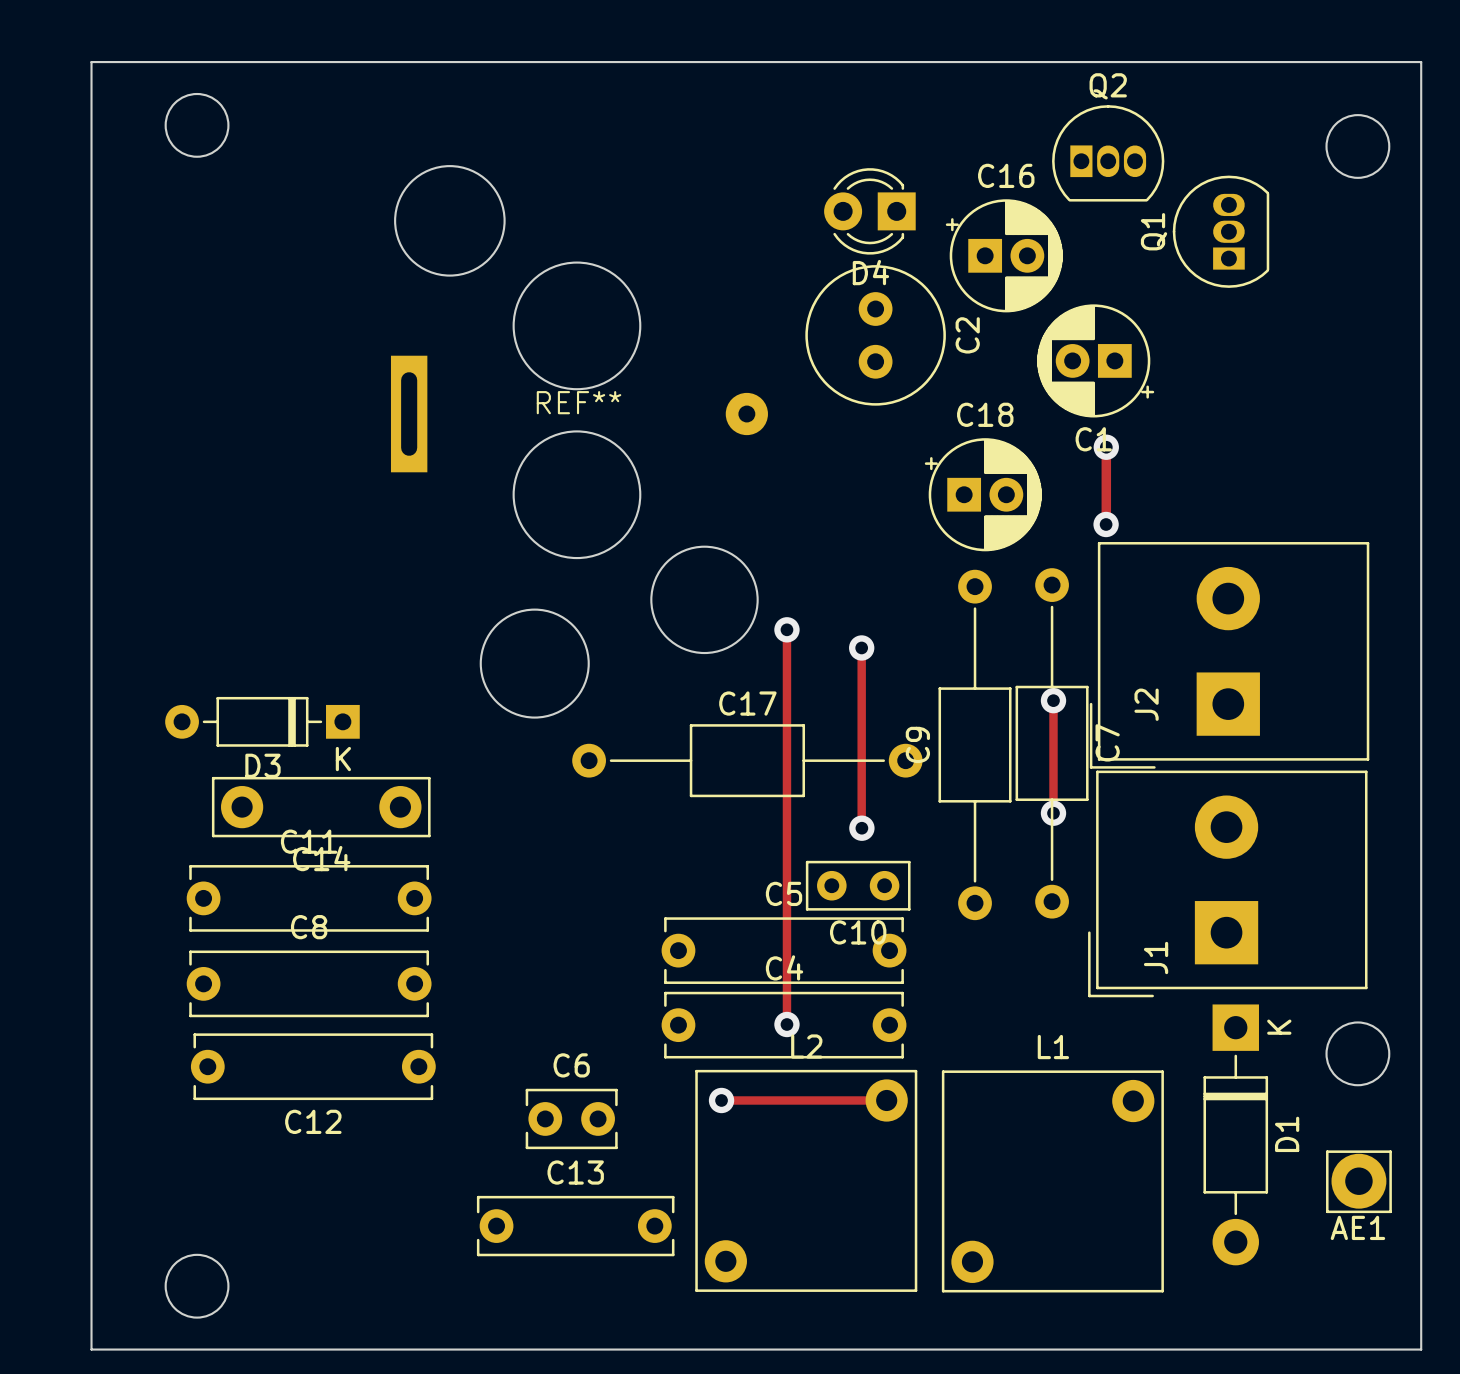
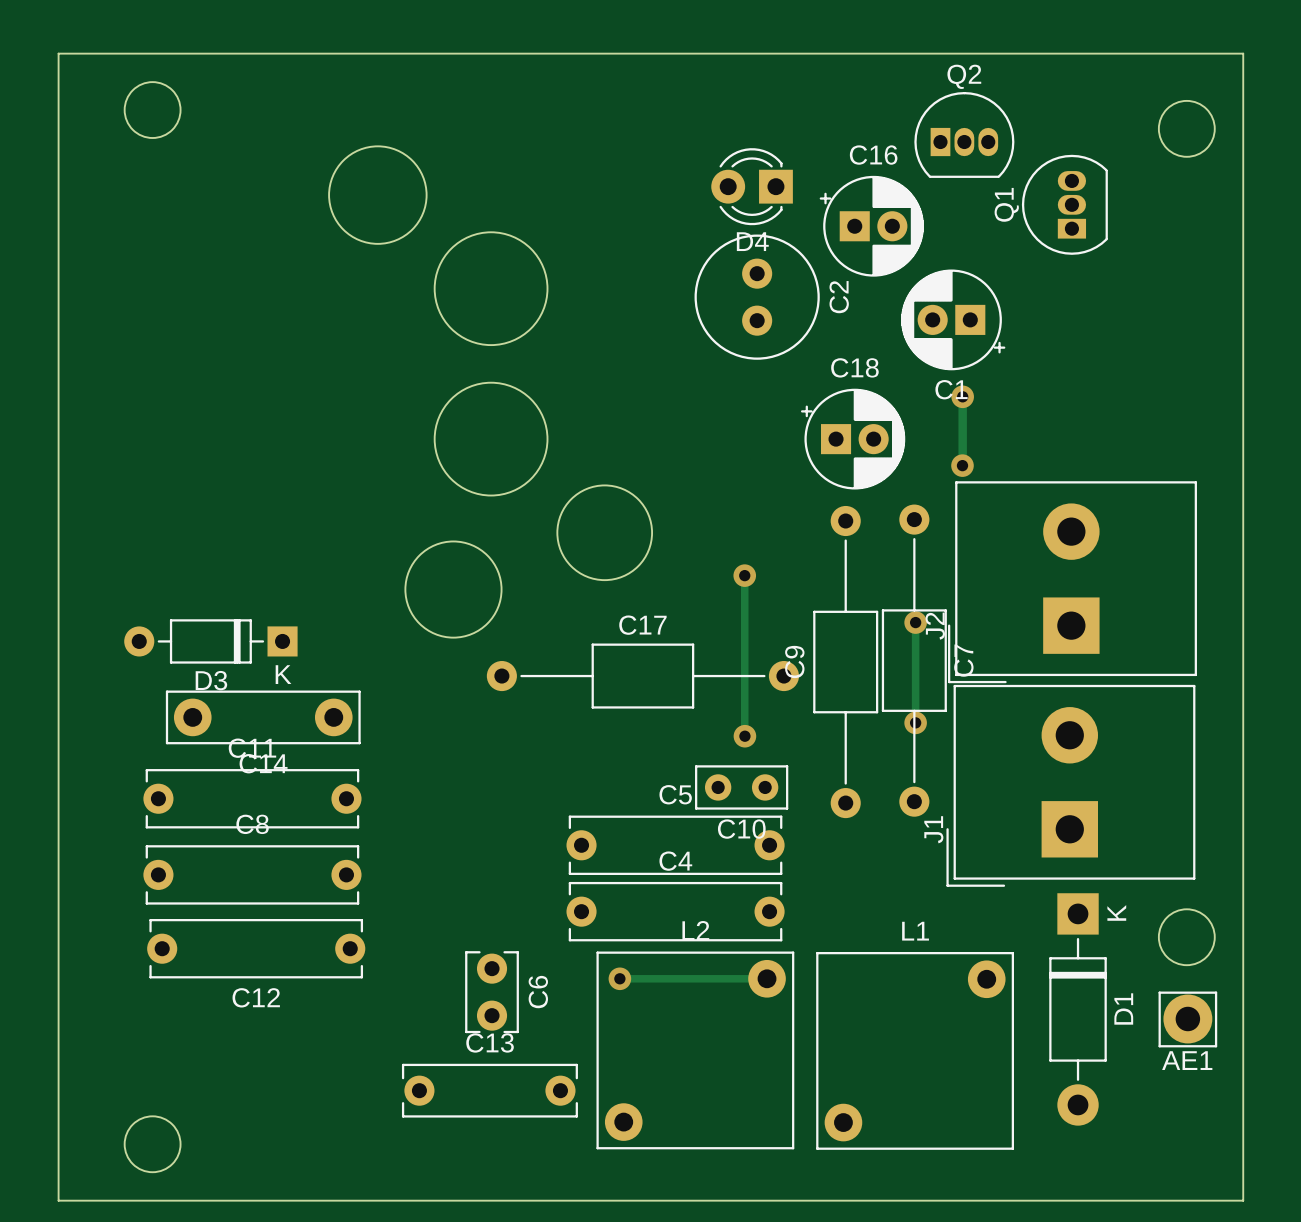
REF**: (579, 414) -> none
track: (786, 629) (786, 1024) -> none
via: (786, 629) -> none
J2 name position: J2 (1146, 704) -> J2 (935, 626)
J1 name position: J1 (1156, 957) -> J1 (933, 829)
via: (786, 1024) -> none
C6 rotation: 0° (571, 1118) -> 90° clockwise (492, 992)
AE1 position: (1358, 1181) -> (1187, 1019)

